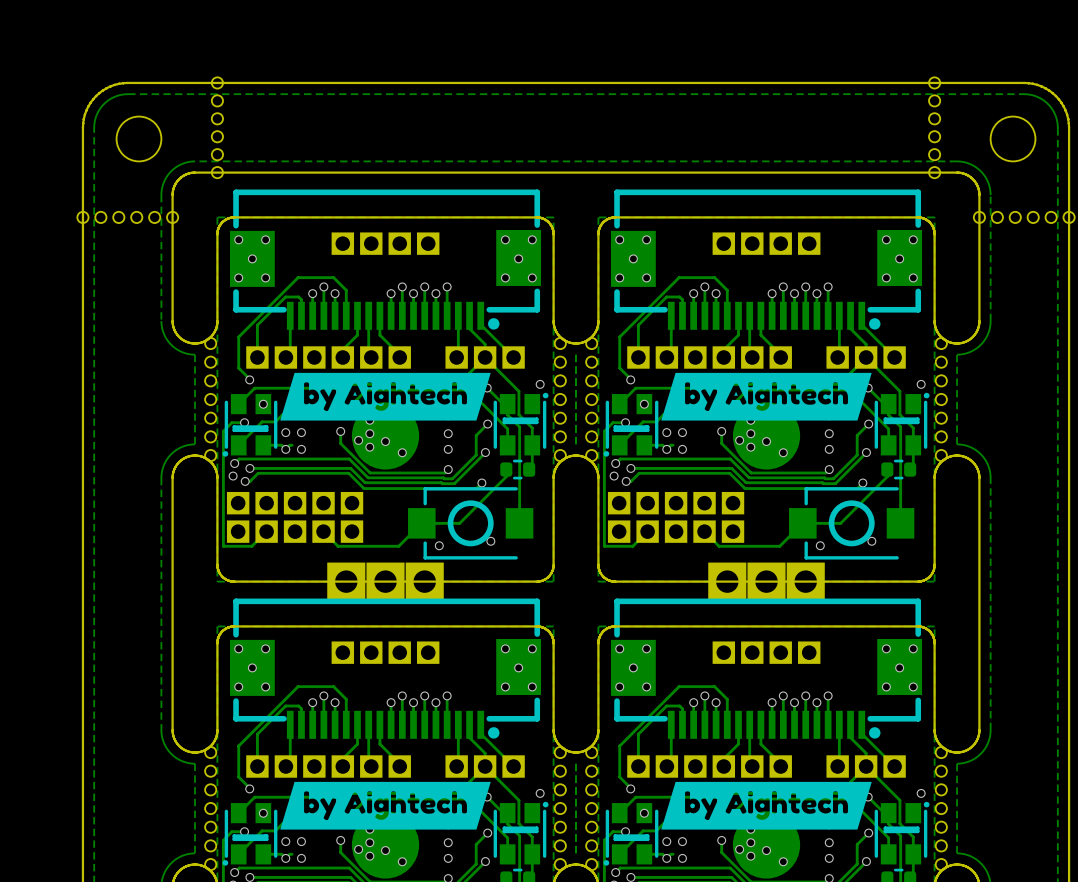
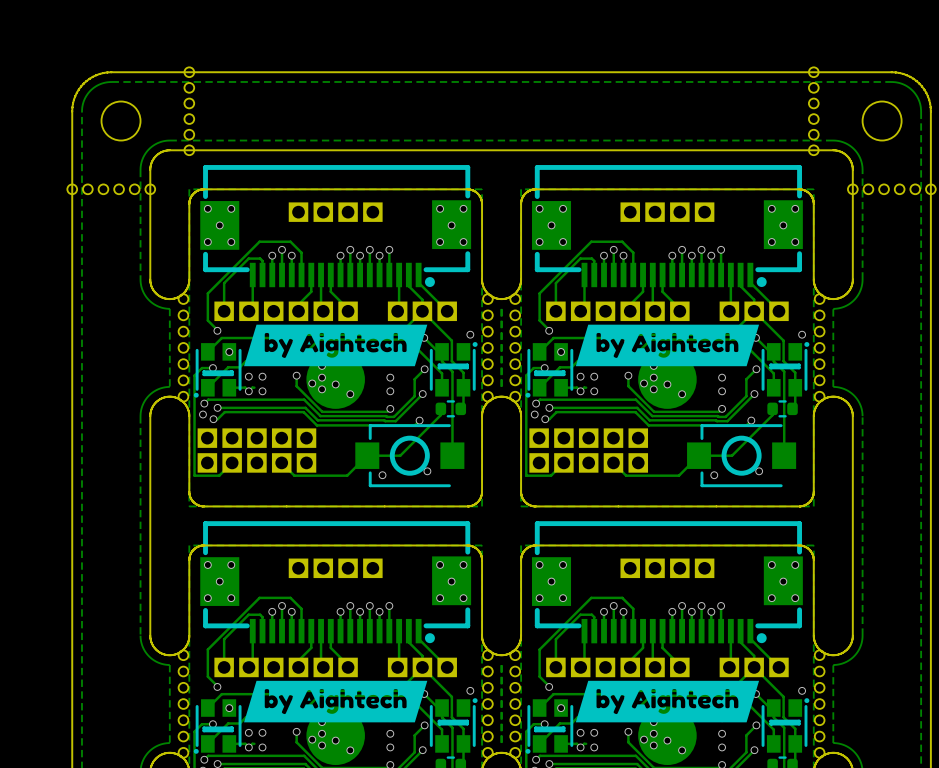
part: (346, 581) -> none
part: (385, 581) -> none
part: (424, 581) -> none
part: (727, 581) -> none
part: (766, 581) -> none
part: (805, 581) -> none

